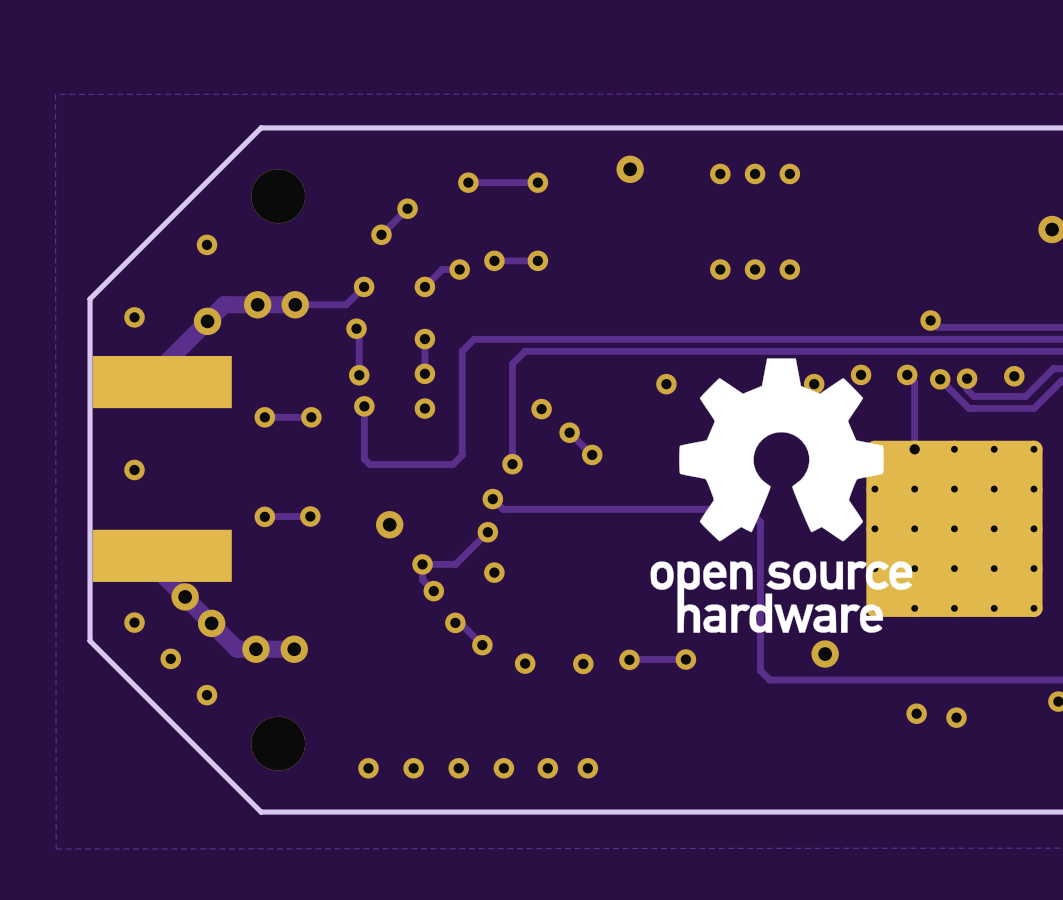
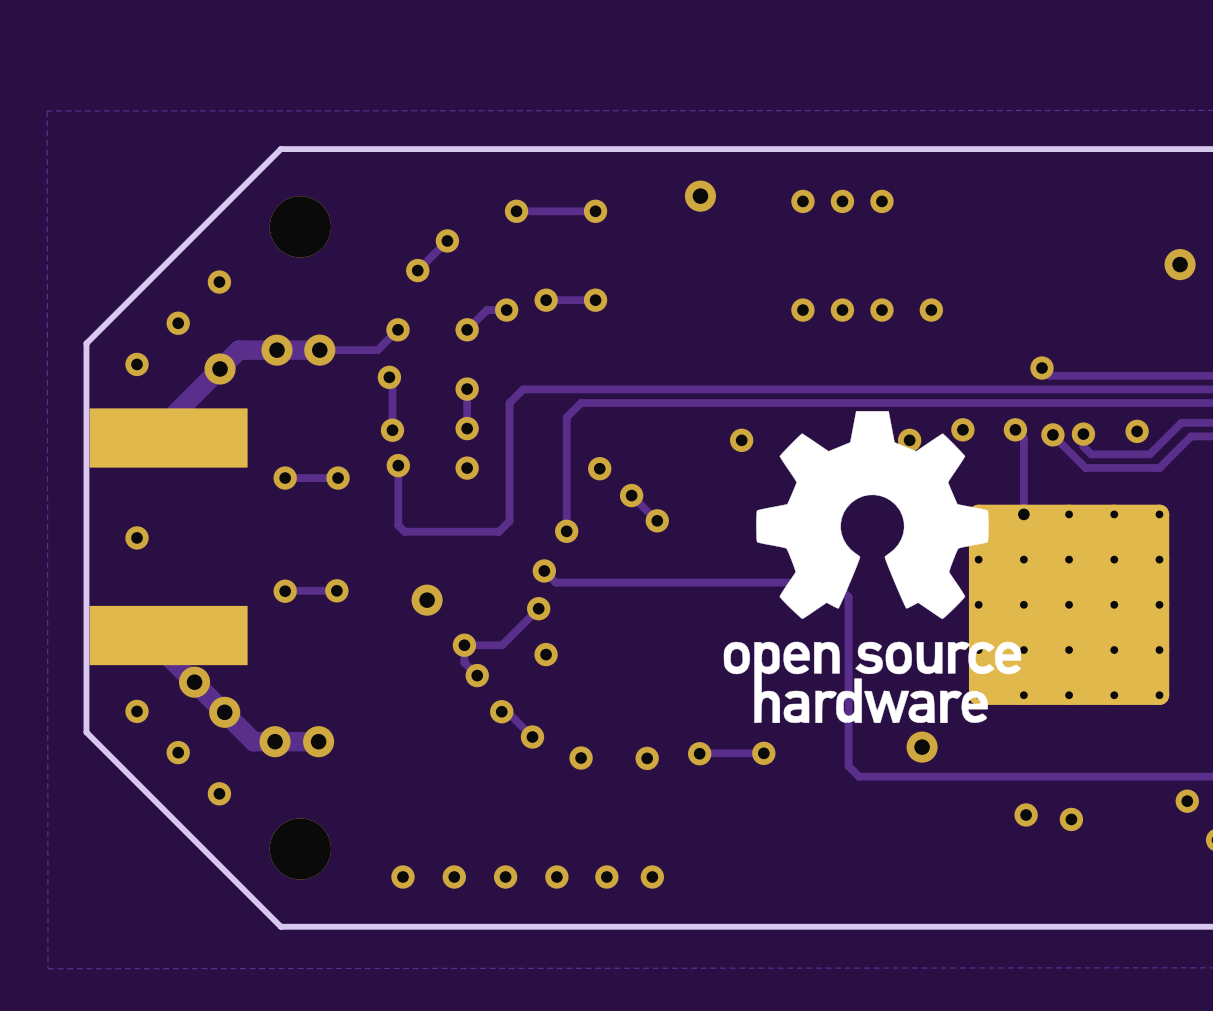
via: none -> (931, 310)
via: none -> (178, 323)

